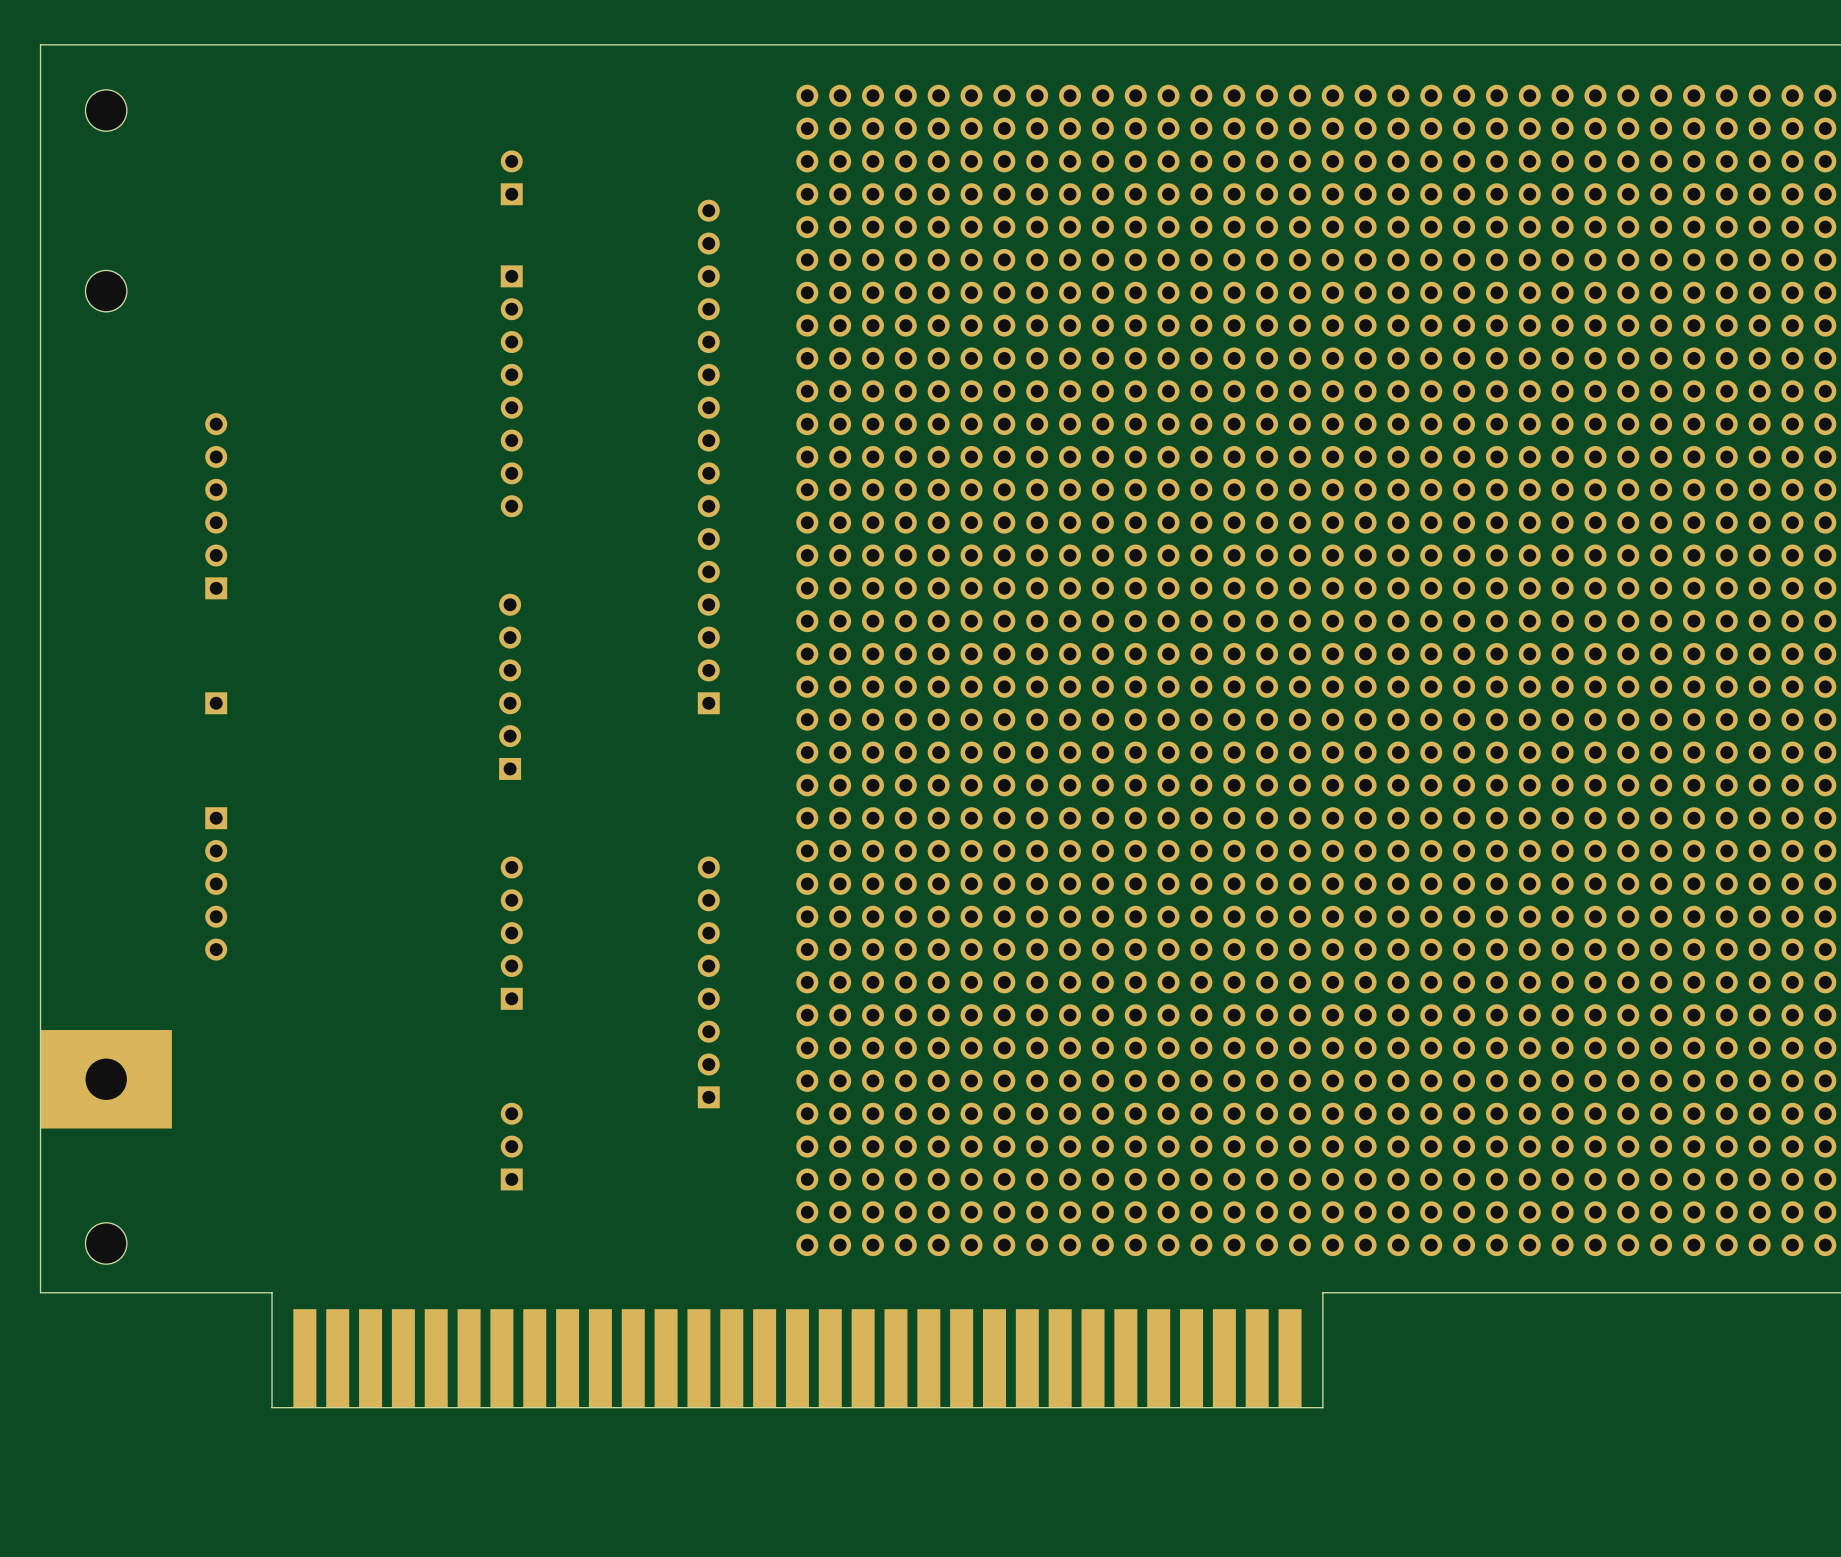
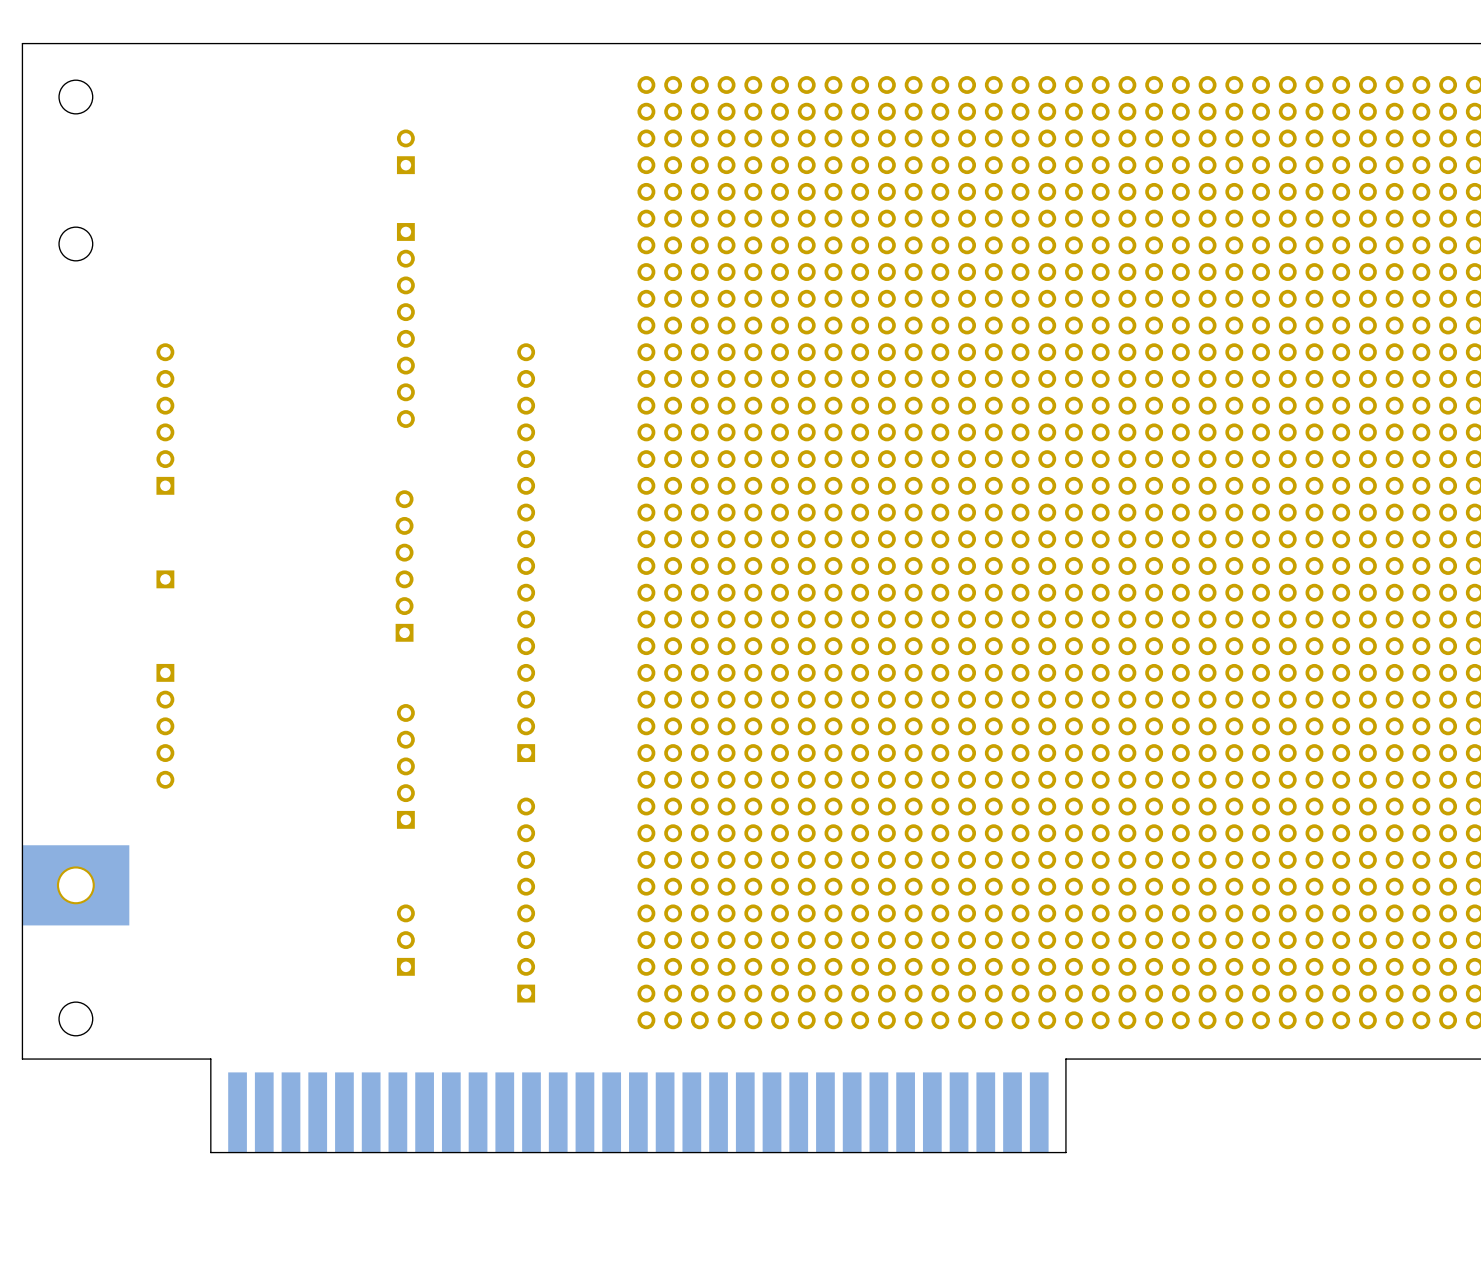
part position: (708, 456) -> (526, 552)
part position: (708, 982) -> (526, 900)

